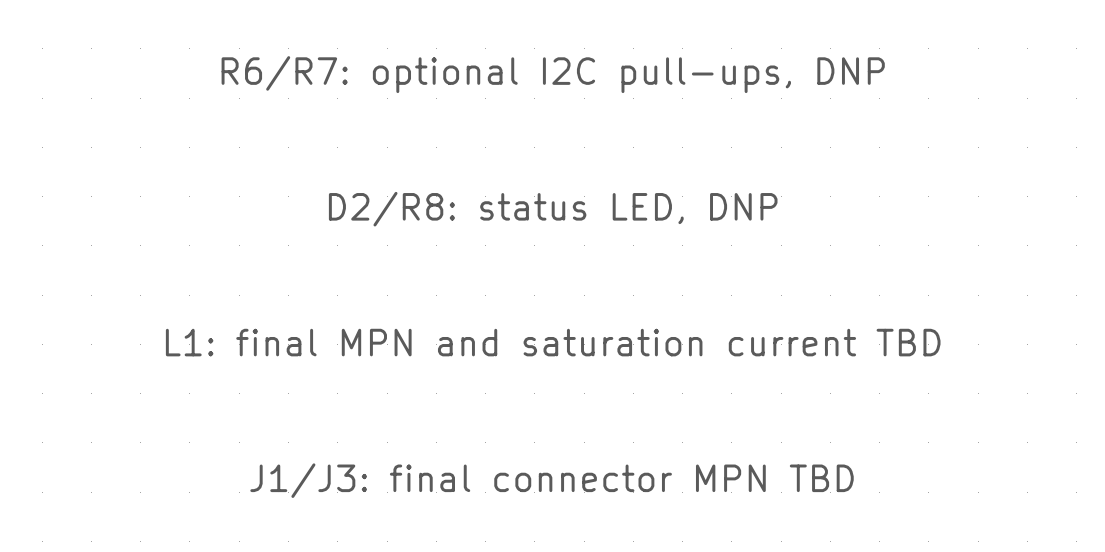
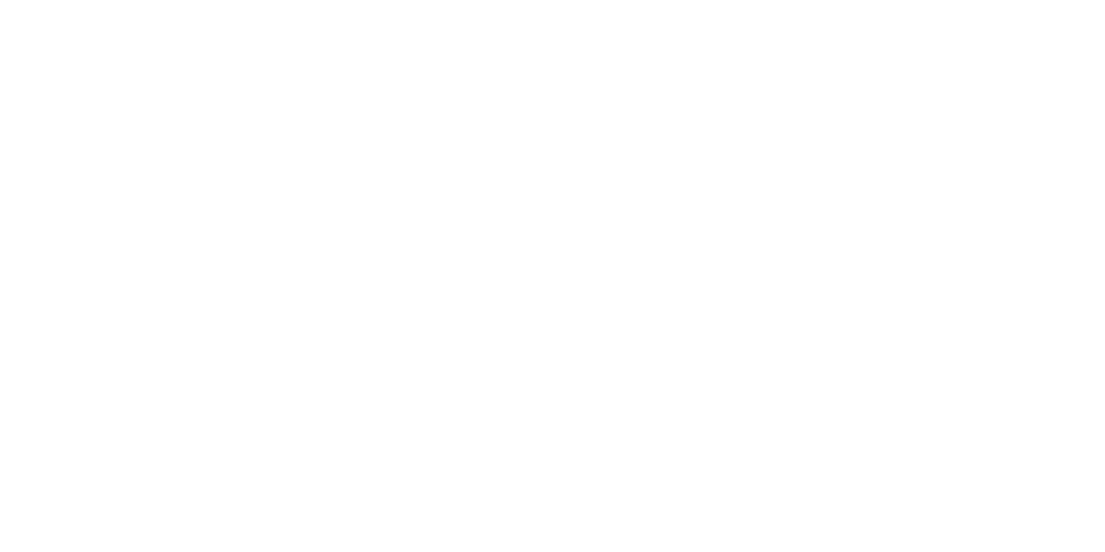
text: R6/R7: optional I2C pull-ups, DNP (553, 74) -> none
text: D2/R8: status LED, DNP (553, 209) -> none
text: L1: final MPN and saturation current TBD (553, 342) -> none
text: J1/J3: final connector MPN TBD (552, 480) -> none

